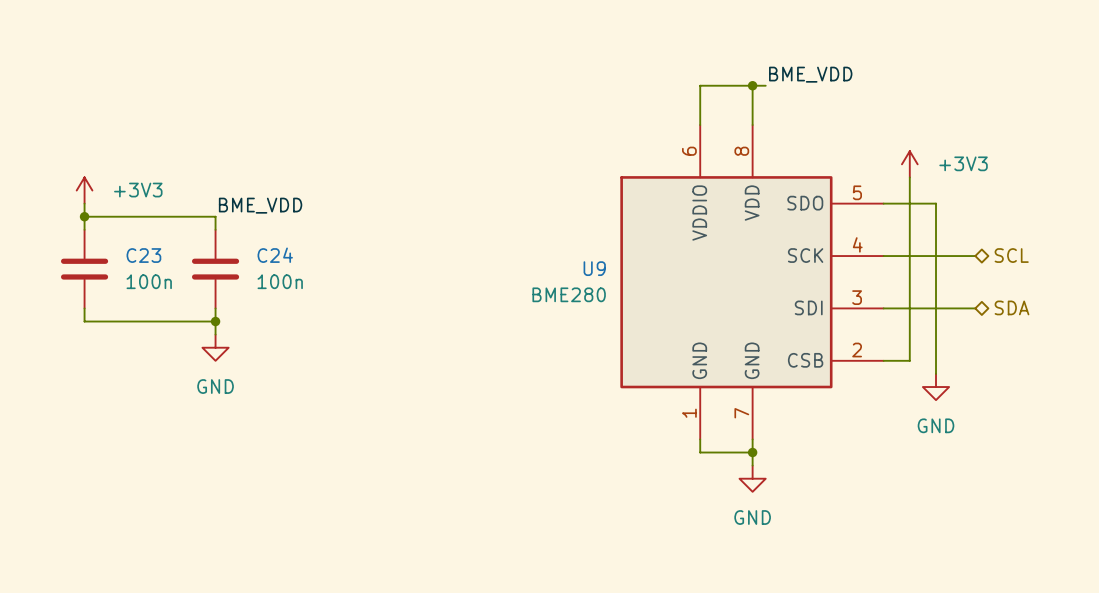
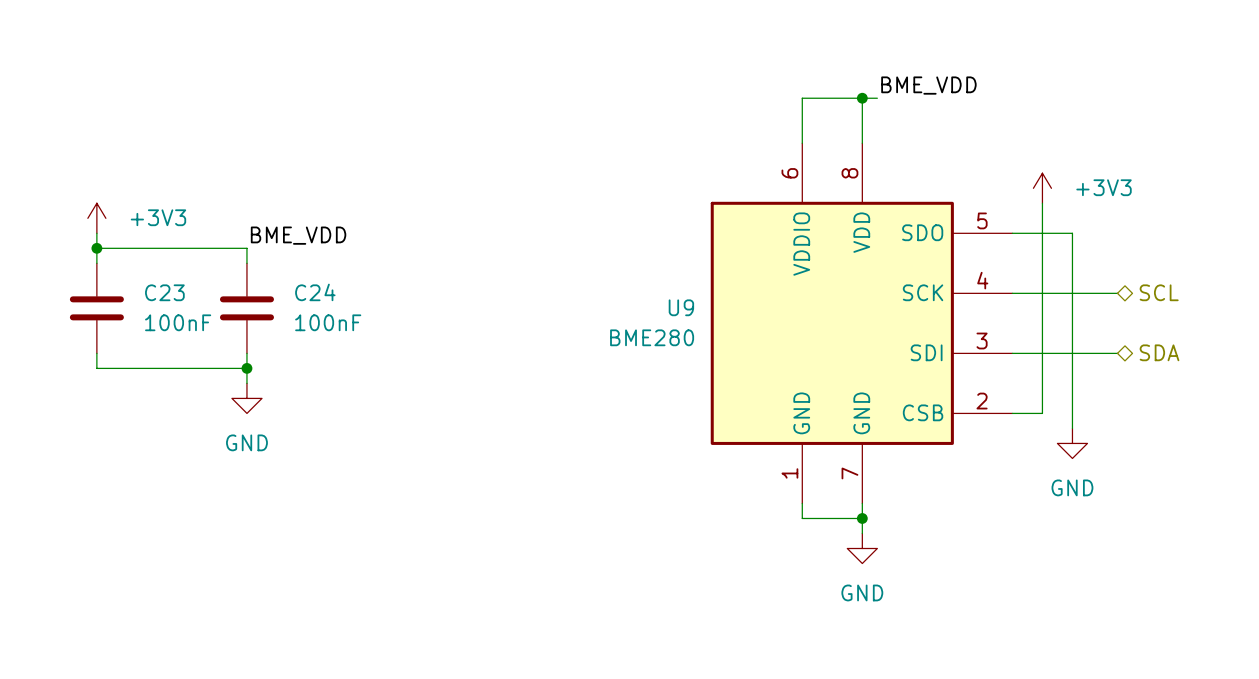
C23 value: 100n (149, 281) -> 100nF (178, 322)
C24 value: 100n (280, 281) -> 100nF (328, 322)

